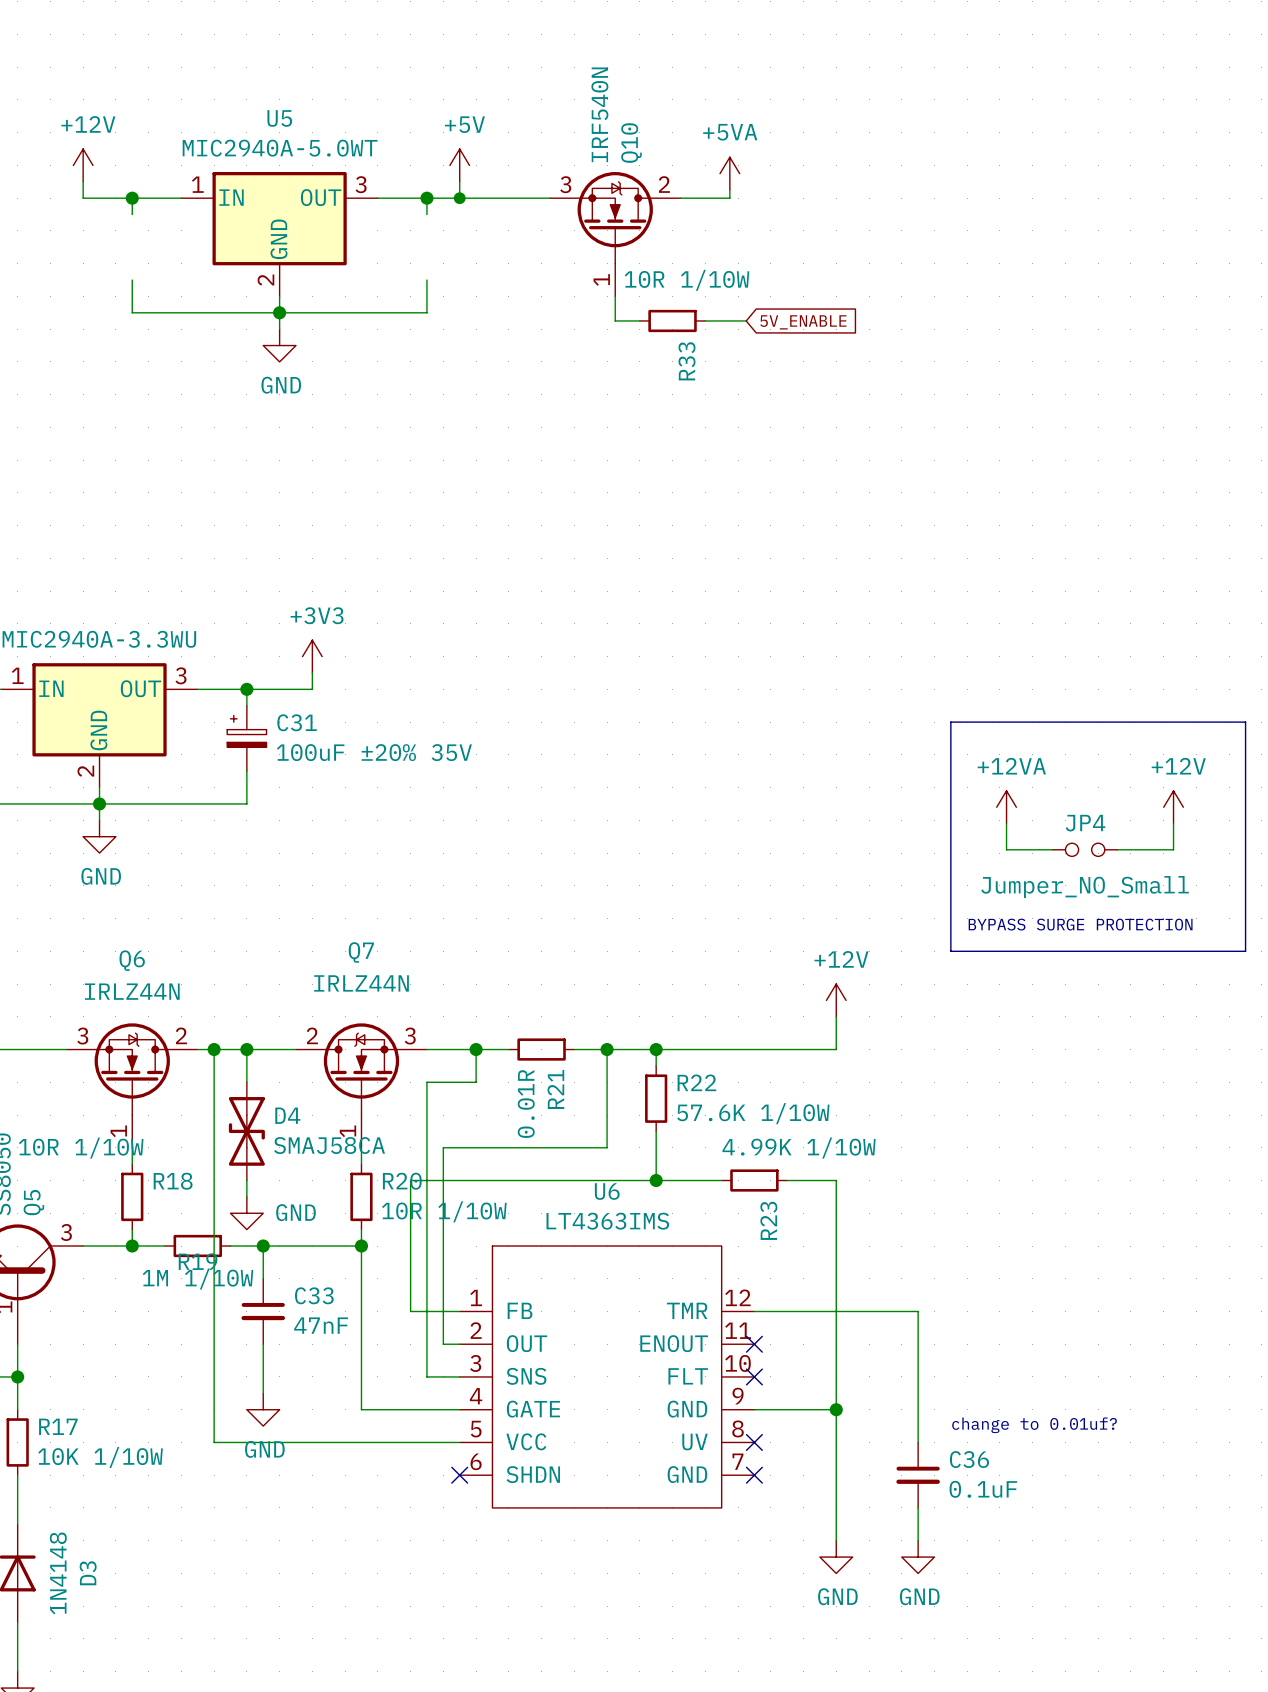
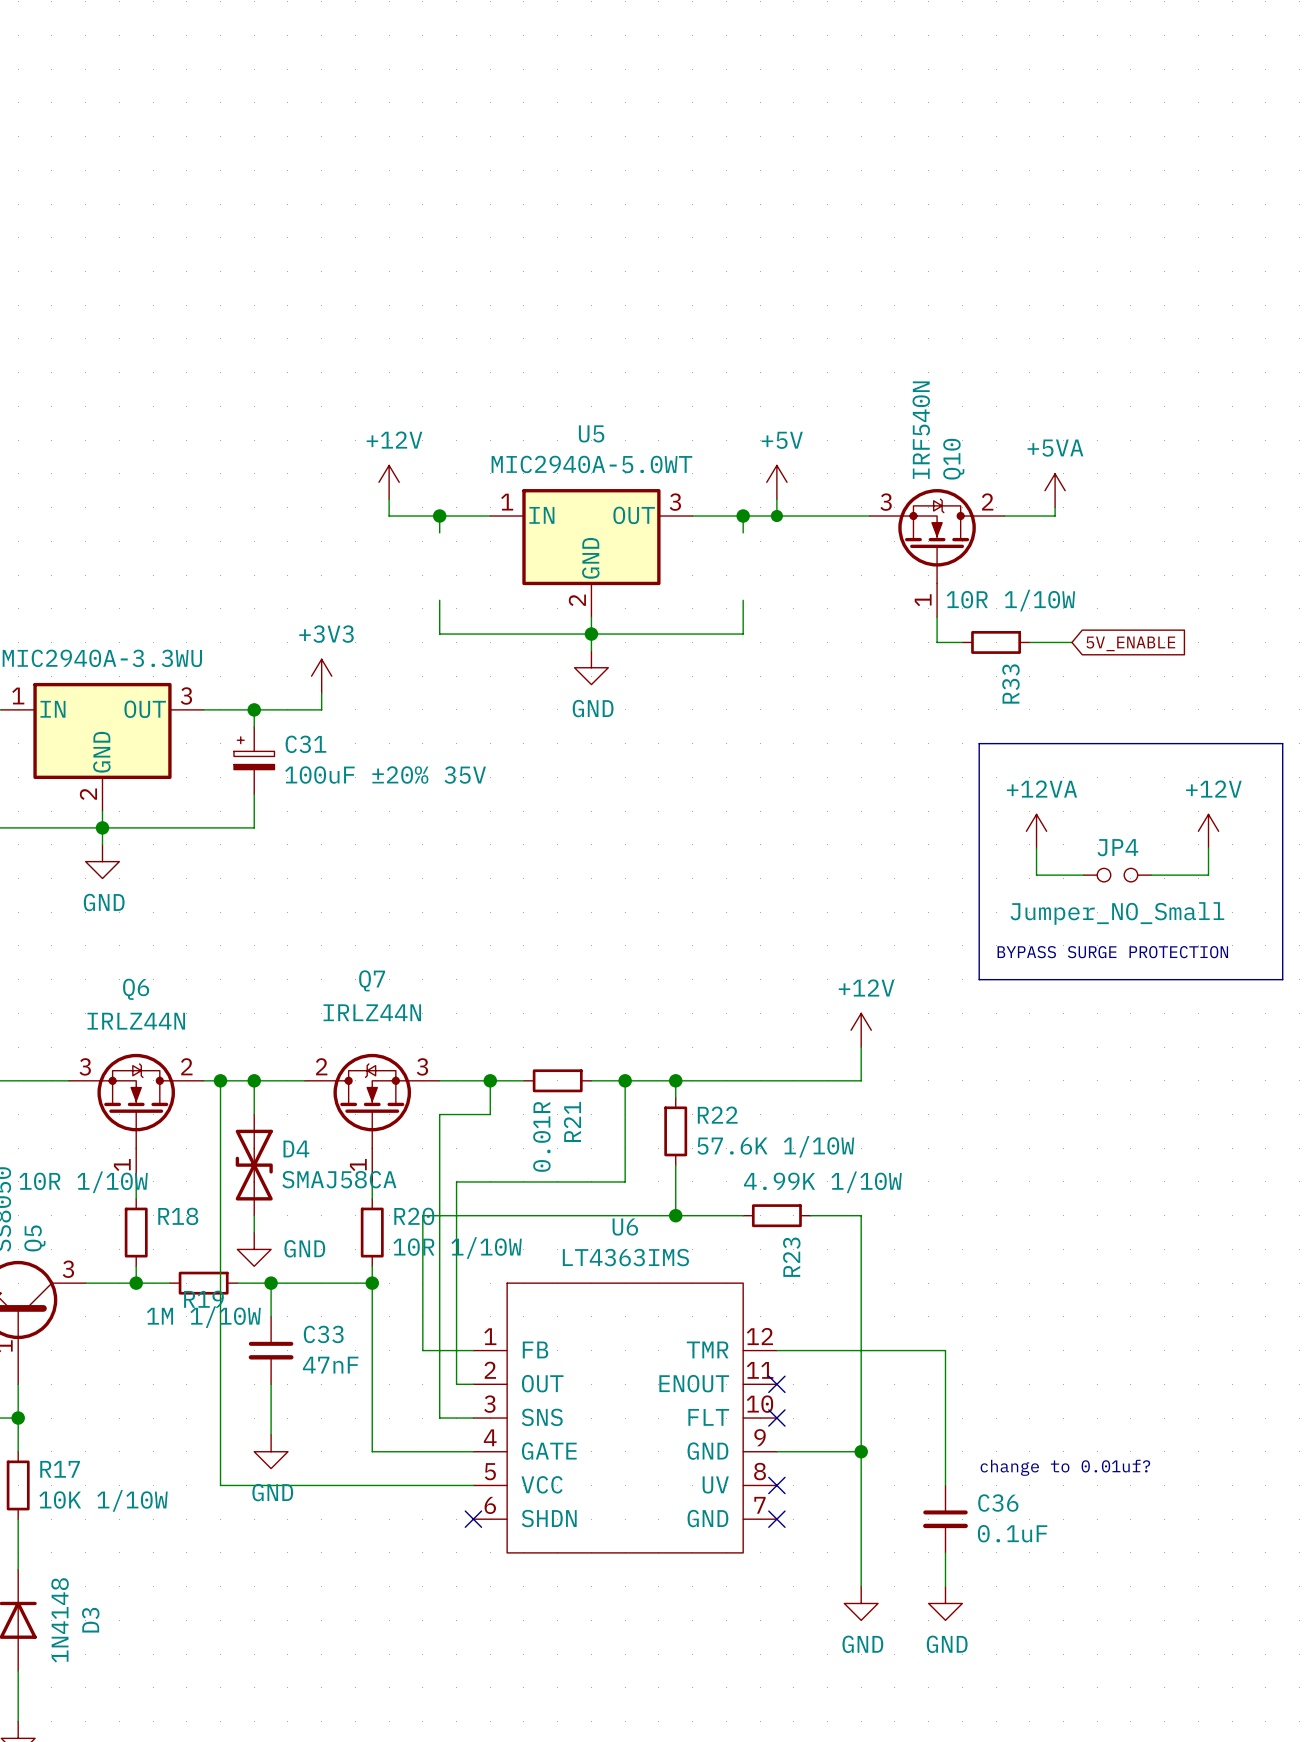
power symbol: +12V (83, 165) -> none
power symbol: +5V (459, 165) -> none
power symbol: +5VA (729, 173) -> none
wire: (83, 181) (83, 198) (181, 198) -> none
wire: (459, 181) (459, 198) -> none
wire: (729, 190) (729, 198) (680, 198) -> none
wire: (132, 198) (132, 214) -> none
junction: (132, 198) -> none
wire: (377, 198) (549, 198) -> none
wire: (426, 198) (426, 214) -> (439, 516) (439, 532)
junction: (426, 198) -> none
junction: (459, 198) -> none
U5 position: (279, 234) -> (591, 553)
Q10 position: (615, 234) -> (937, 553)
wire: (132, 280) (132, 312) (426, 312) (426, 280) -> none
wire: (279, 296) (279, 329) -> none
wire: (615, 296) (615, 320) (639, 320) -> none
junction: (279, 312) -> none
R33 position: (672, 320) -> (996, 642)
wire: (705, 320) (746, 320) -> none
global label: 5V_ENABLE (803, 322) -> none
power symbol: GND (279, 345) -> none
power symbol: none -> +12V (389, 482)
power symbol: none -> +5V (776, 482)
power symbol: none -> +5VA (1055, 490)
wire: none -> (389, 499) (389, 516) (490, 516)
wire: none -> (776, 499) (776, 516)
wire: none -> (1055, 507) (1055, 516) (1004, 516)
junction: none -> (439, 516)
wire: none -> (692, 516) (869, 516)
wire: none -> (743, 516) (743, 532)
junction: none -> (743, 516)
junction: none -> (776, 516)
wire: none -> (439, 600) (439, 634) (743, 634) (743, 600)
wire: none -> (591, 617) (591, 650)
wire: none -> (937, 617) (937, 642) (962, 642)
junction: none -> (591, 634)
wire: none -> (1029, 642) (1071, 642)
global label: none -> 5V_ENABLE (1130, 643)
power symbol: none -> GND (591, 667)

